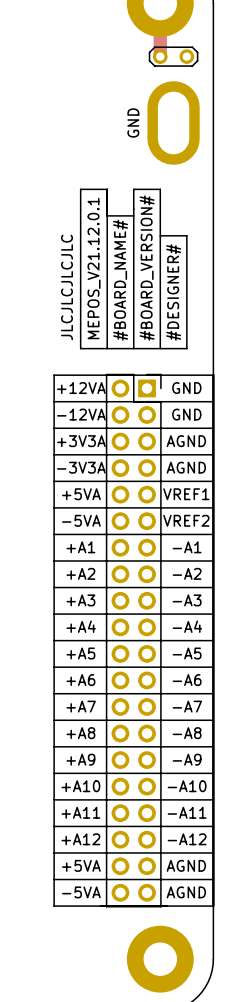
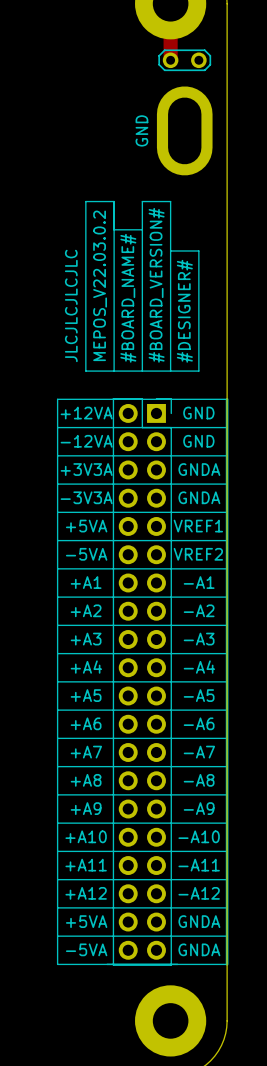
text: MEPOS_V21.12.0.1 (94, 268) -> MEPOS_V22.03.0.2 (100, 285)
text: AGND (186, 441) -> GNDA (199, 469)
text: AGND (186, 467) -> GNDA (199, 497)
text: AGND (186, 865) -> GNDA (199, 921)
text: AGND (186, 892) -> GNDA (199, 949)

